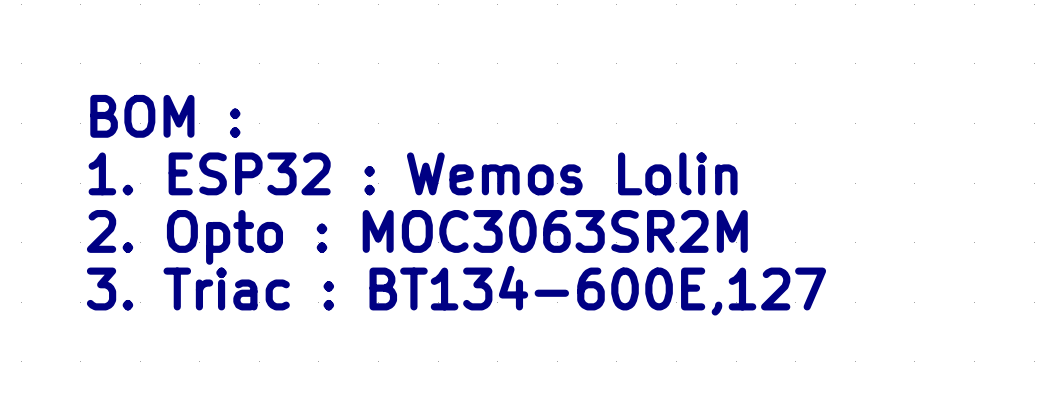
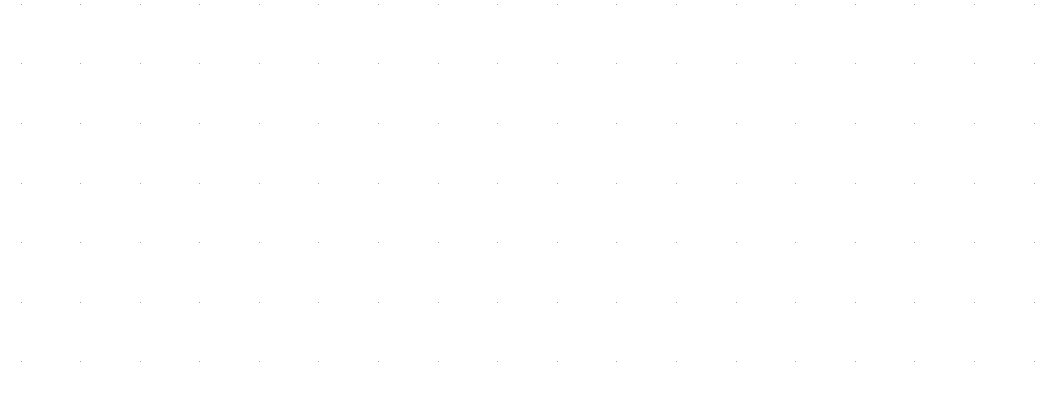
text: BOM : (165, 116) -> none
text: 1. ESP32 : Wemos Lolin (413, 173) -> none
text: 2. Opto : MOC3063SR2M (417, 237) -> none
text: 3. Triac : BT134-600E,127 (456, 290) -> none

